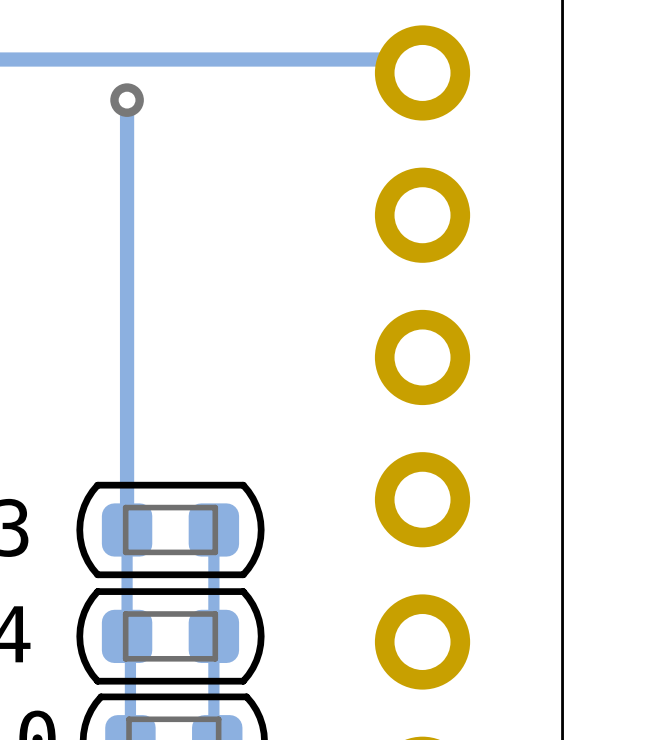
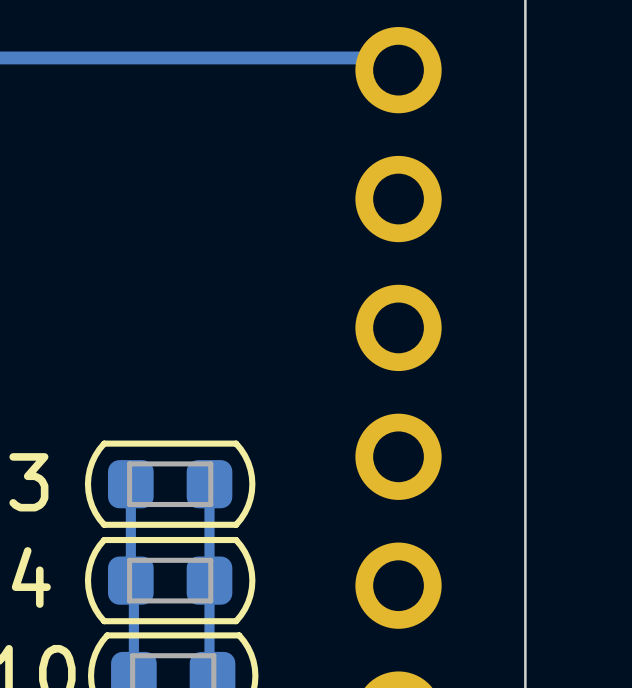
track: (125, 98) (127, 529) -> none
via: (127, 100) -> none

